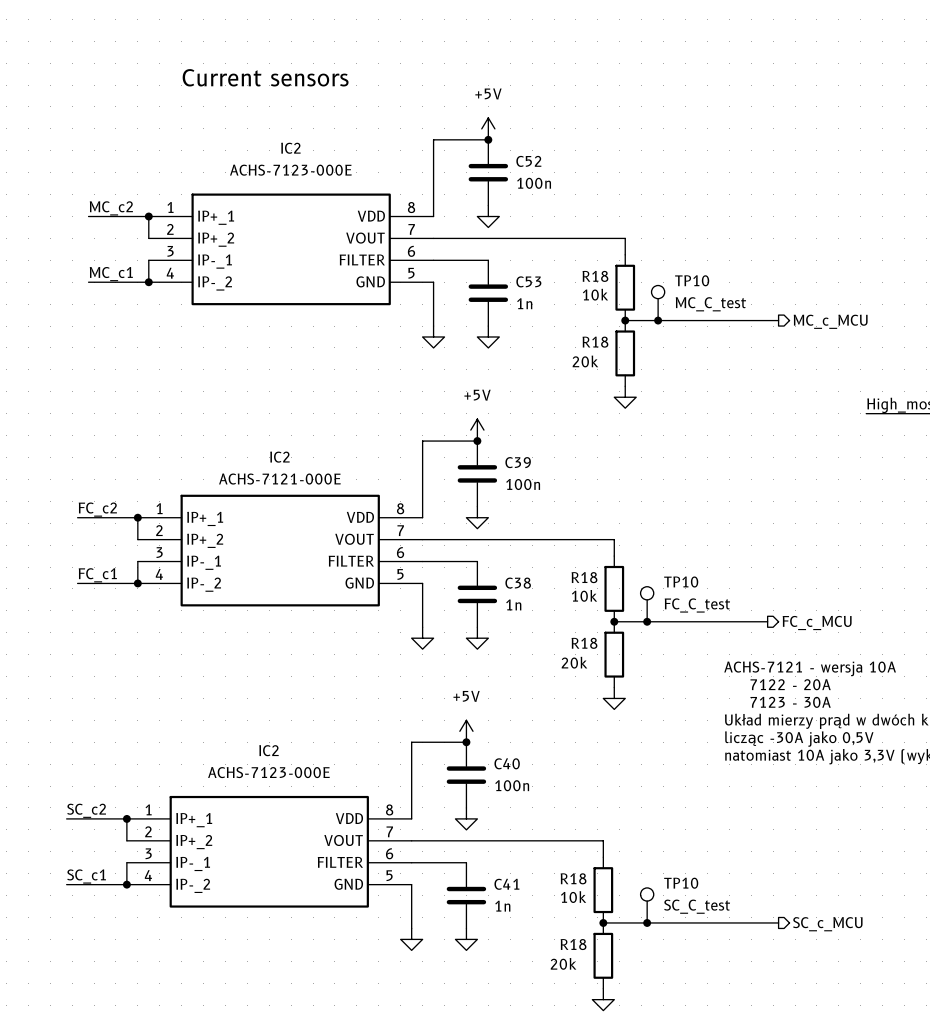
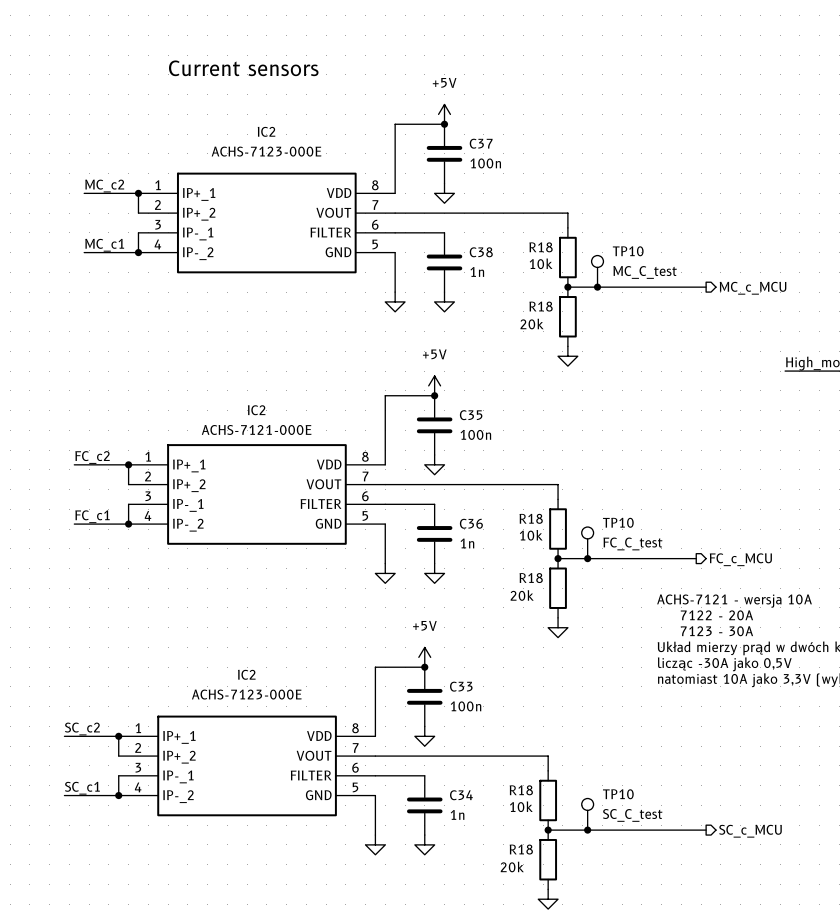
C52 name: C52 (528, 161) -> C37 (481, 143)
C53 name: C53 (528, 281) -> C38 (481, 252)
C39 name: C39 (518, 462) -> C35 (471, 415)
C38 name: C38 (518, 583) -> C36 (471, 523)
C40 name: C40 (507, 763) -> C33 (461, 686)
C41 name: C41 (506, 884) -> C34 (461, 795)

